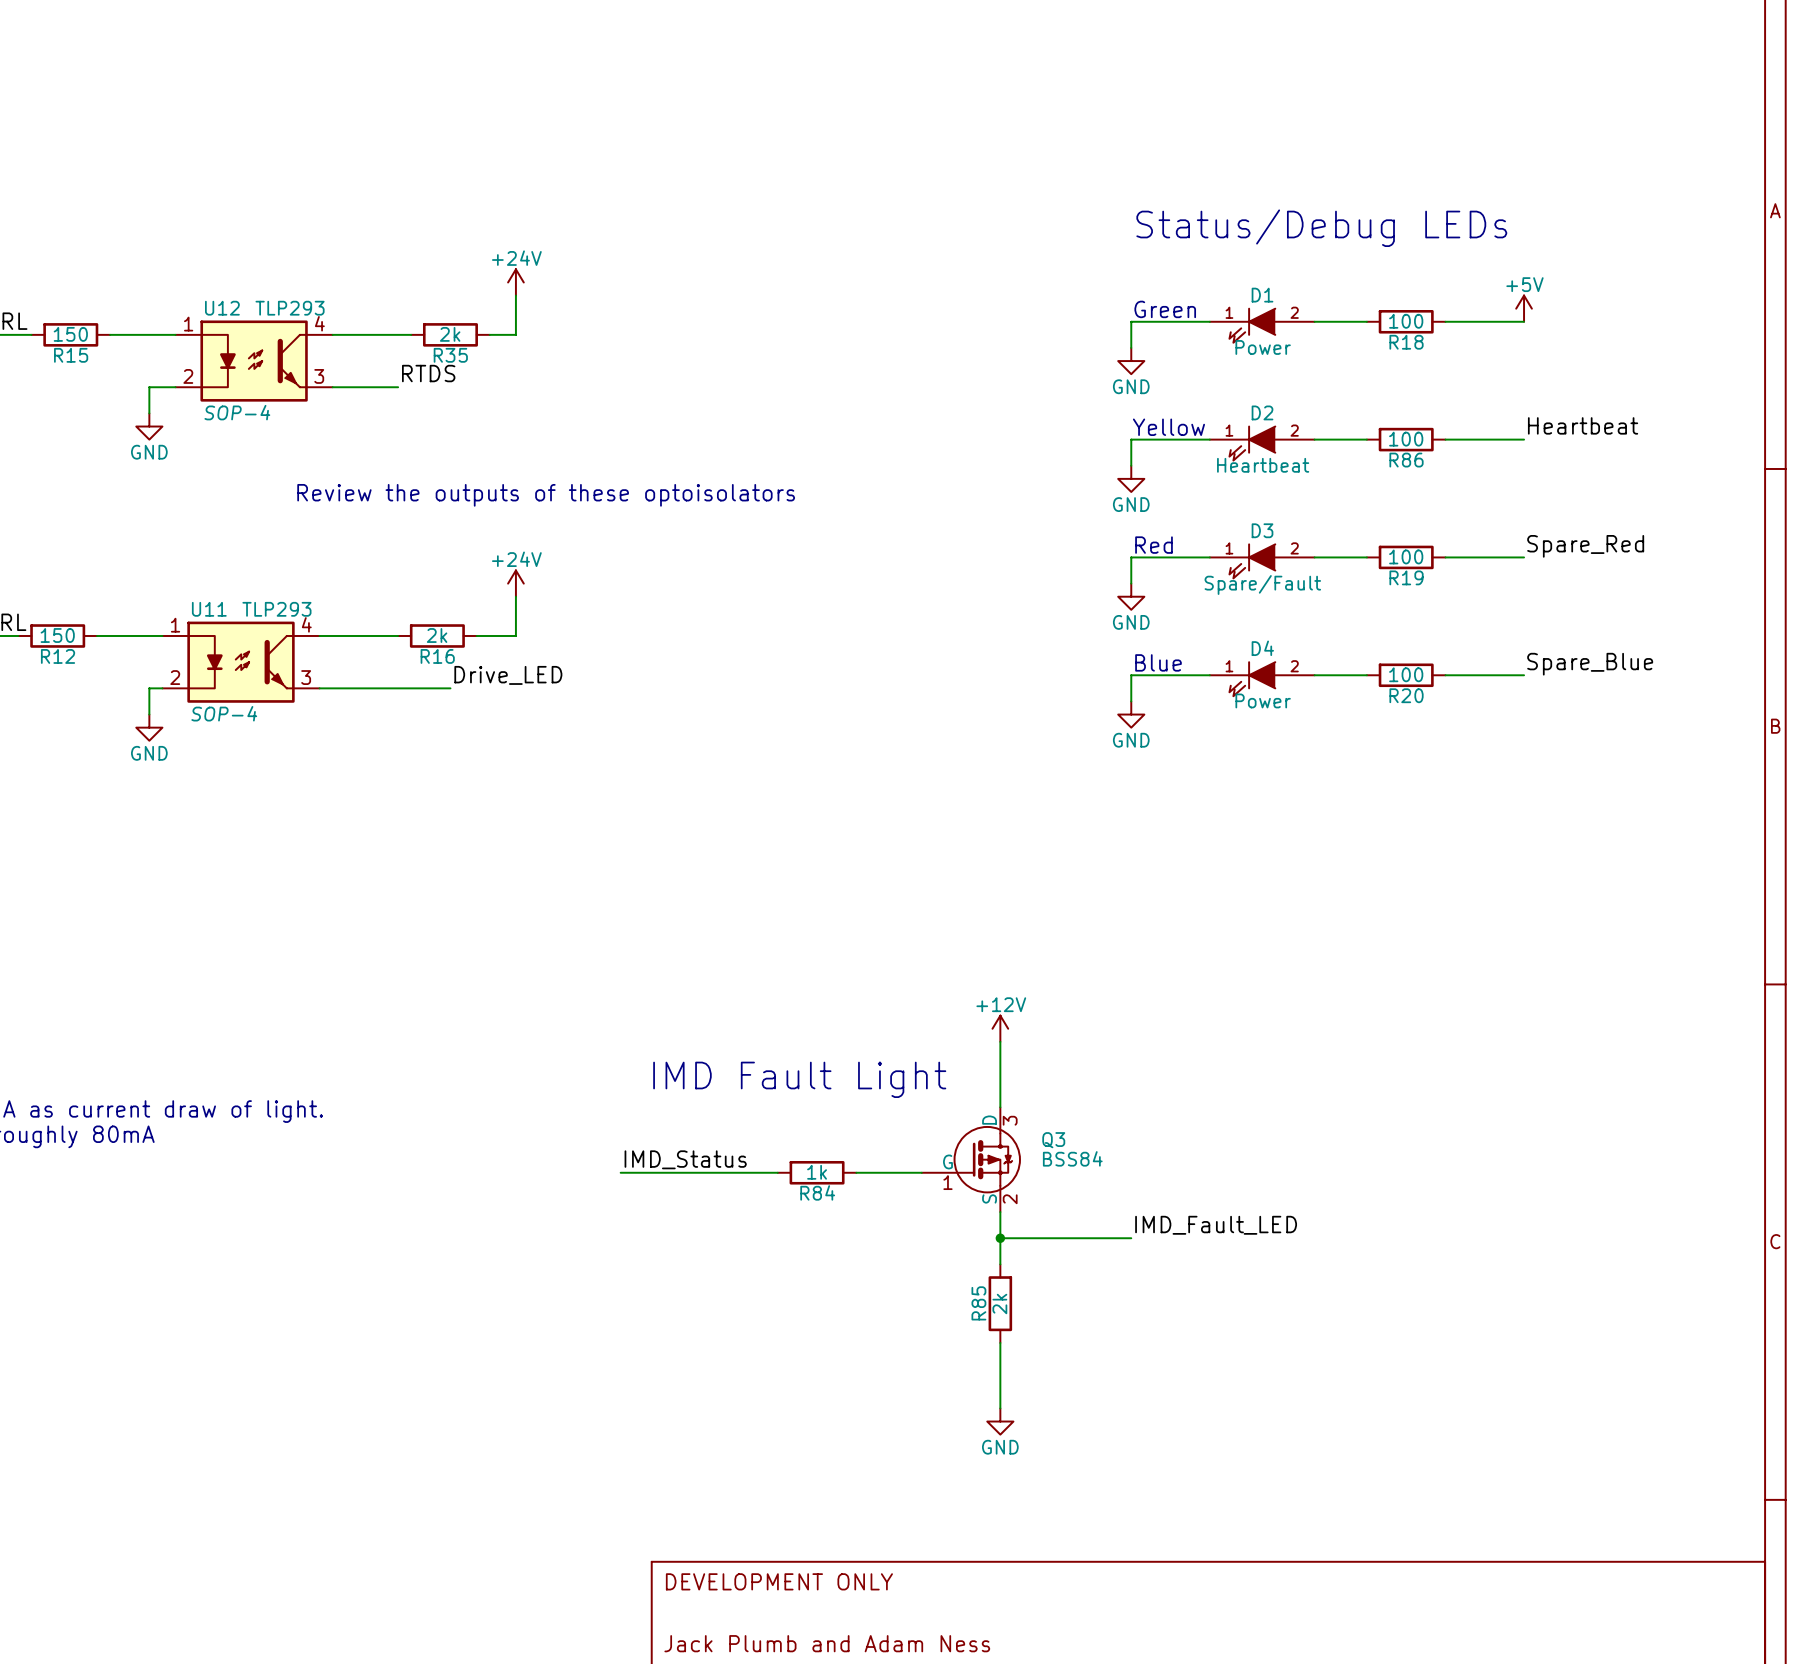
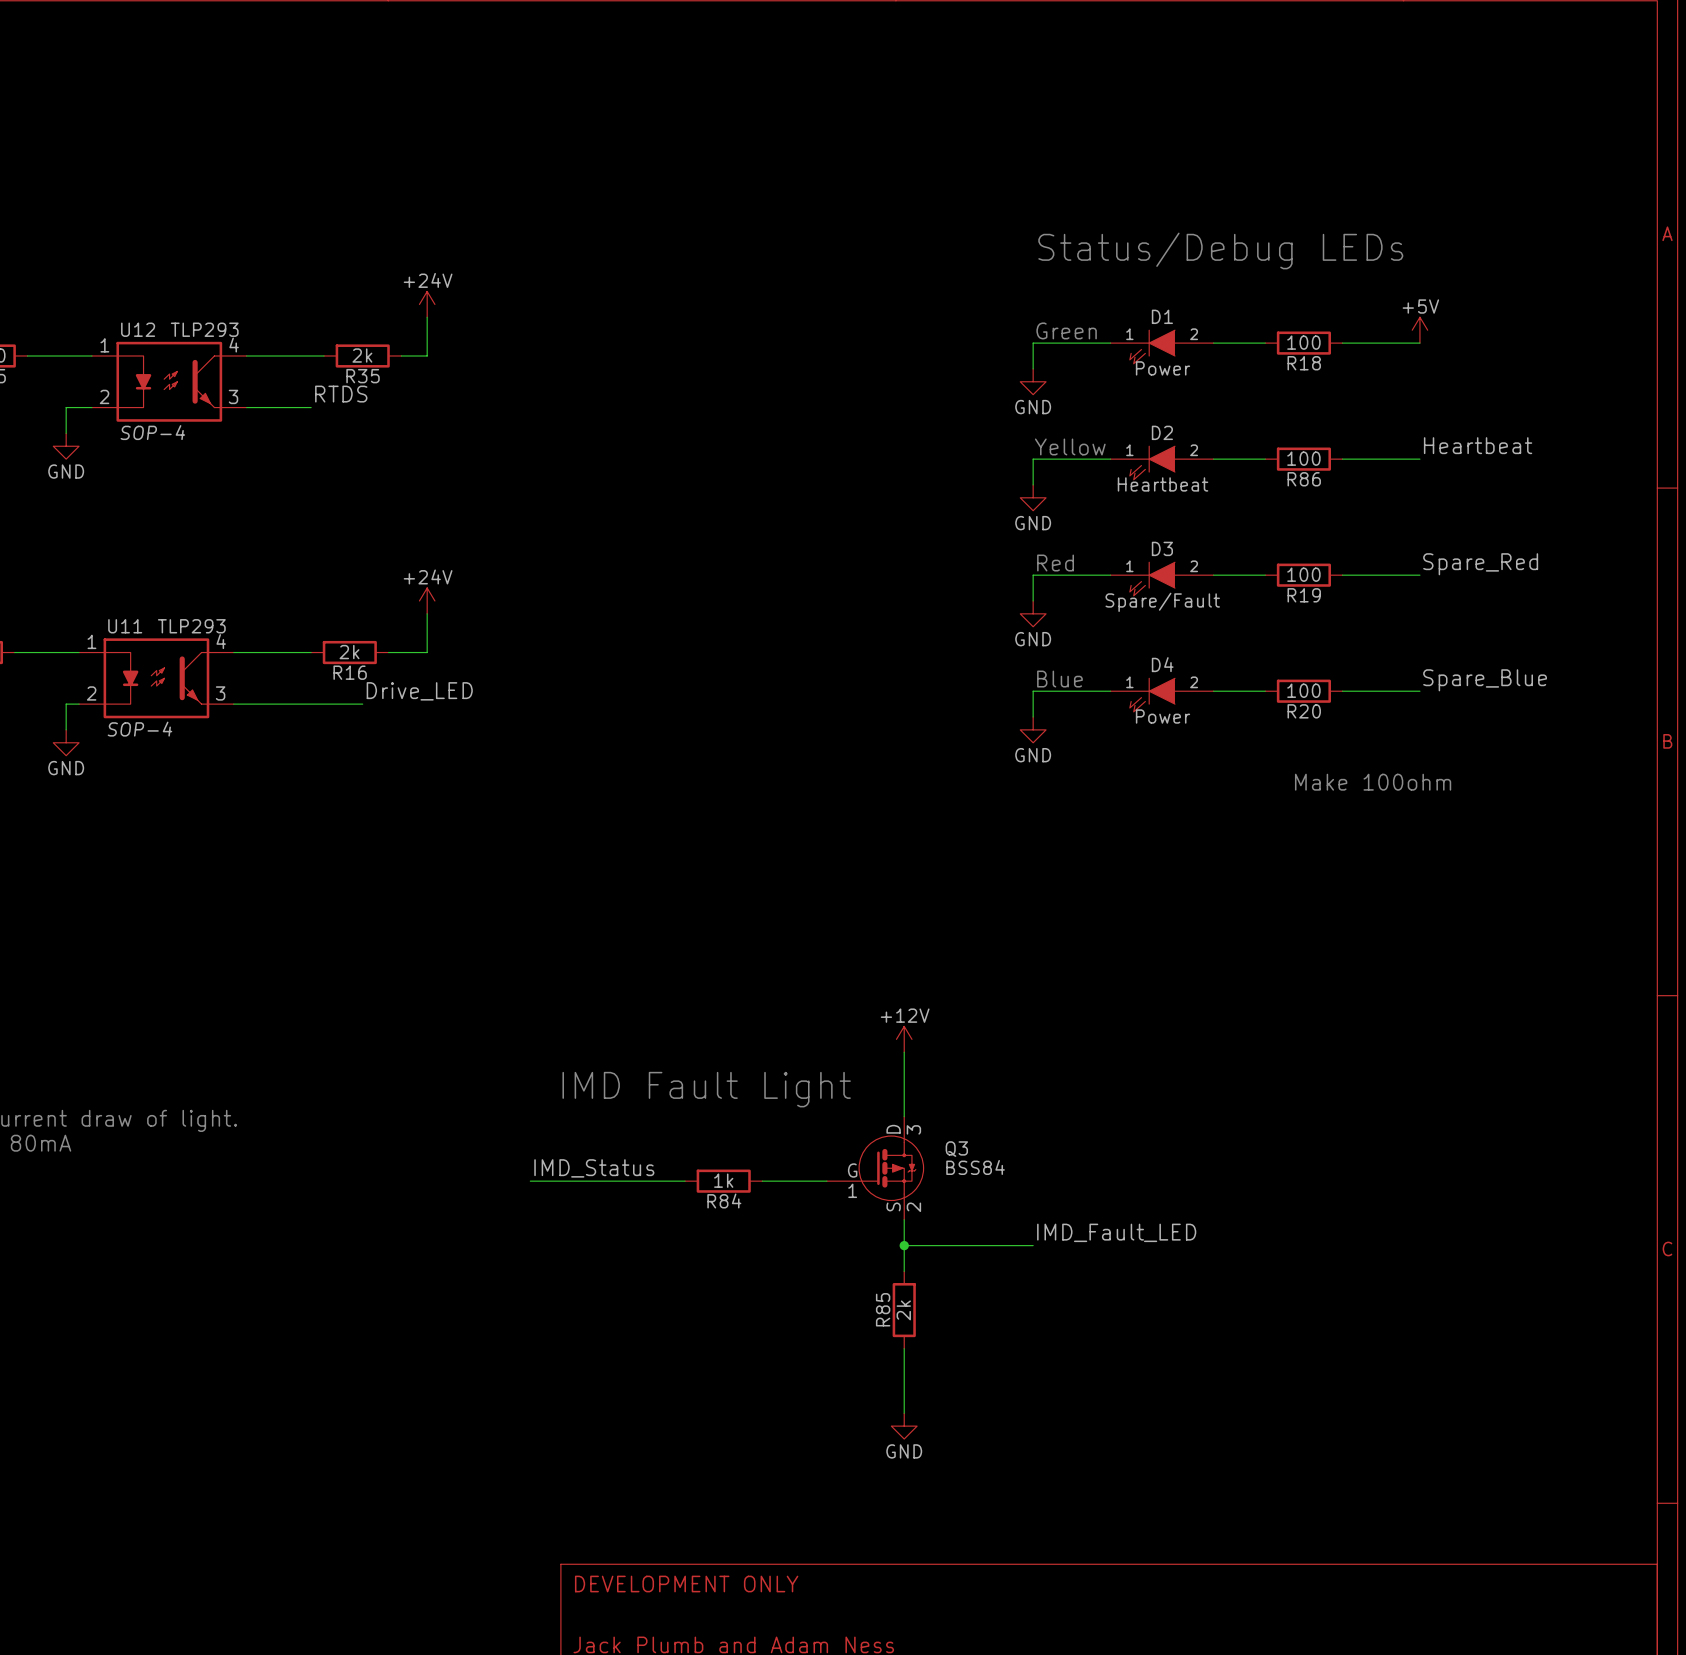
text: Review the outputs of these optoisolators (546, 495) -> none
text: none -> Make 100ohm (1373, 782)

